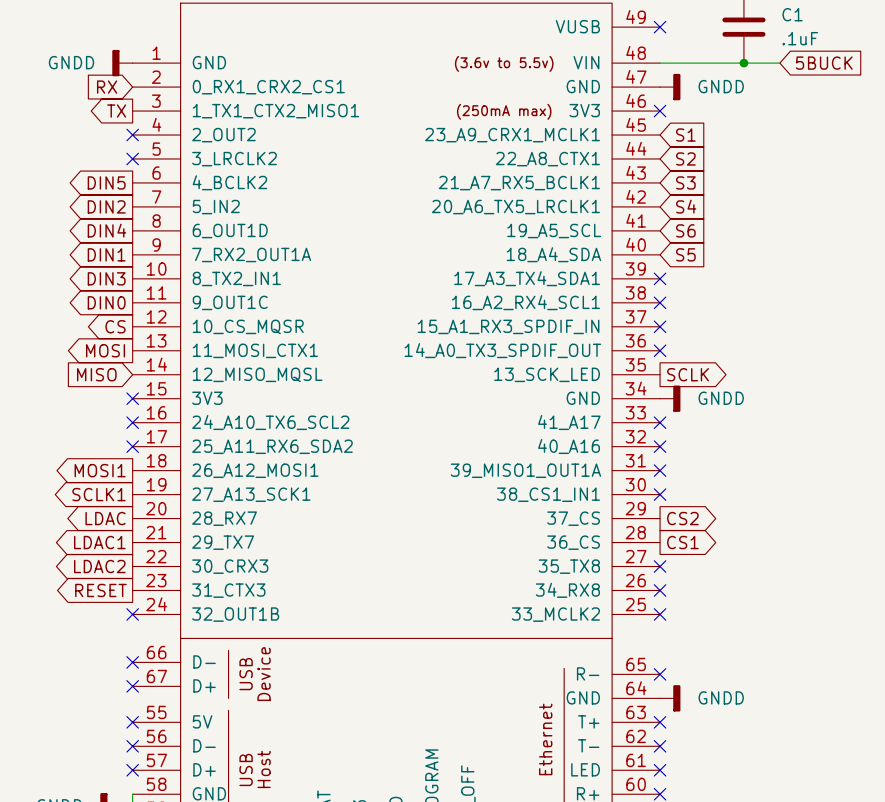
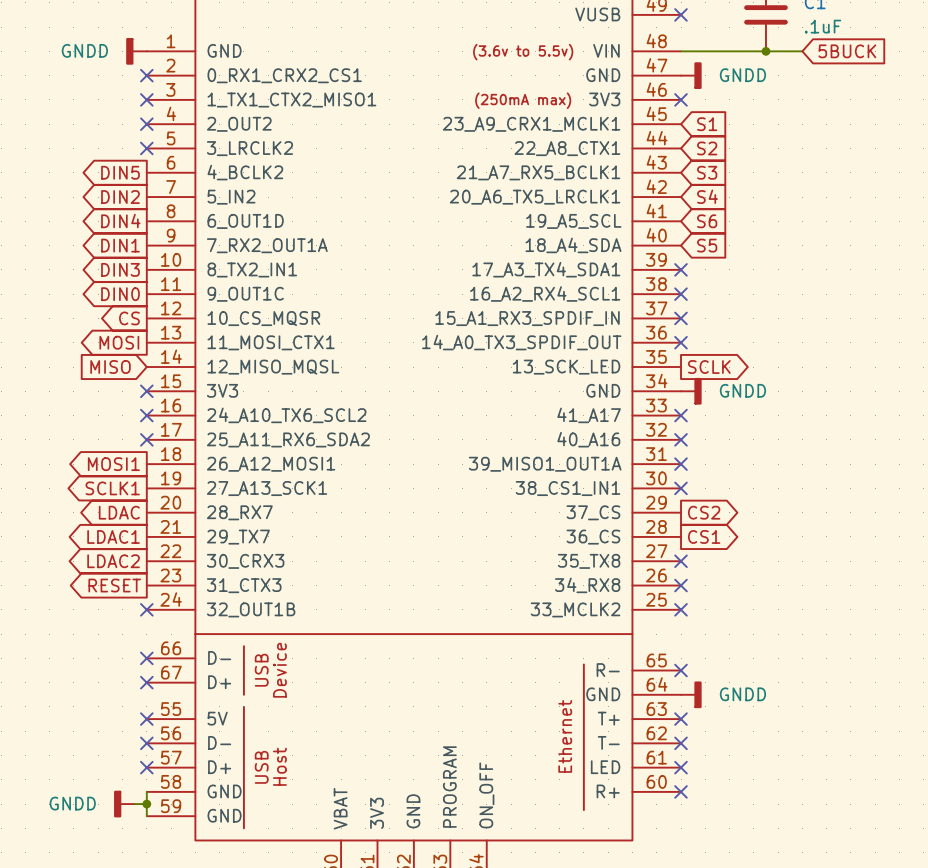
global label: RX (107, 87) -> none
no-connect mark: none -> (146, 75)
global label: TX (116, 111) -> none
no-connect mark: none -> (146, 99)

